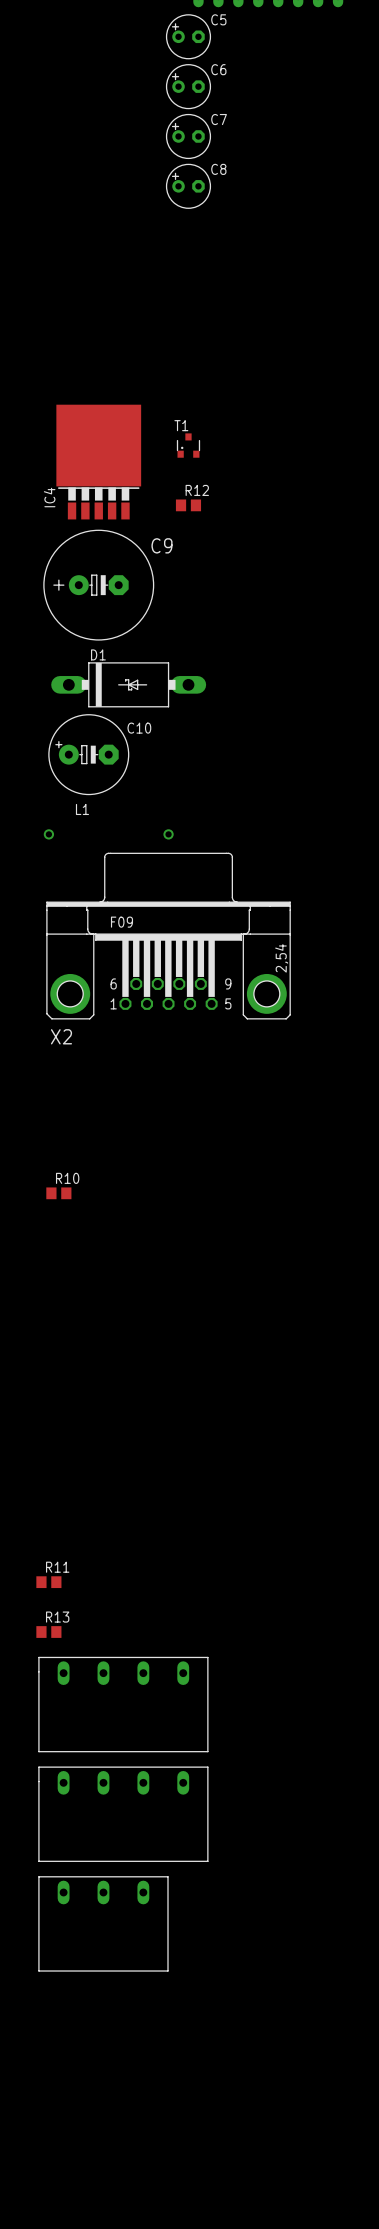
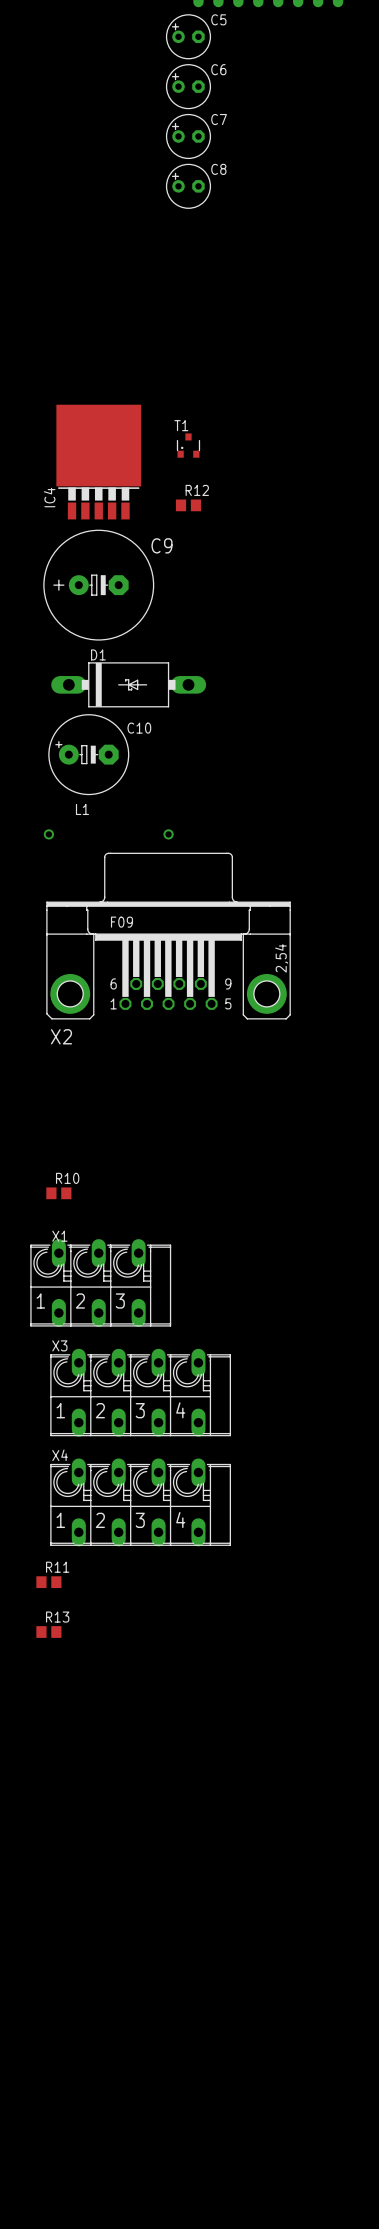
X1: none -> (100, 1283)
X3: none -> (140, 1392)
X4: none -> (140, 1502)
part: (123, 1704) -> none
part: (123, 1814) -> none
part: (103, 1923) -> none

